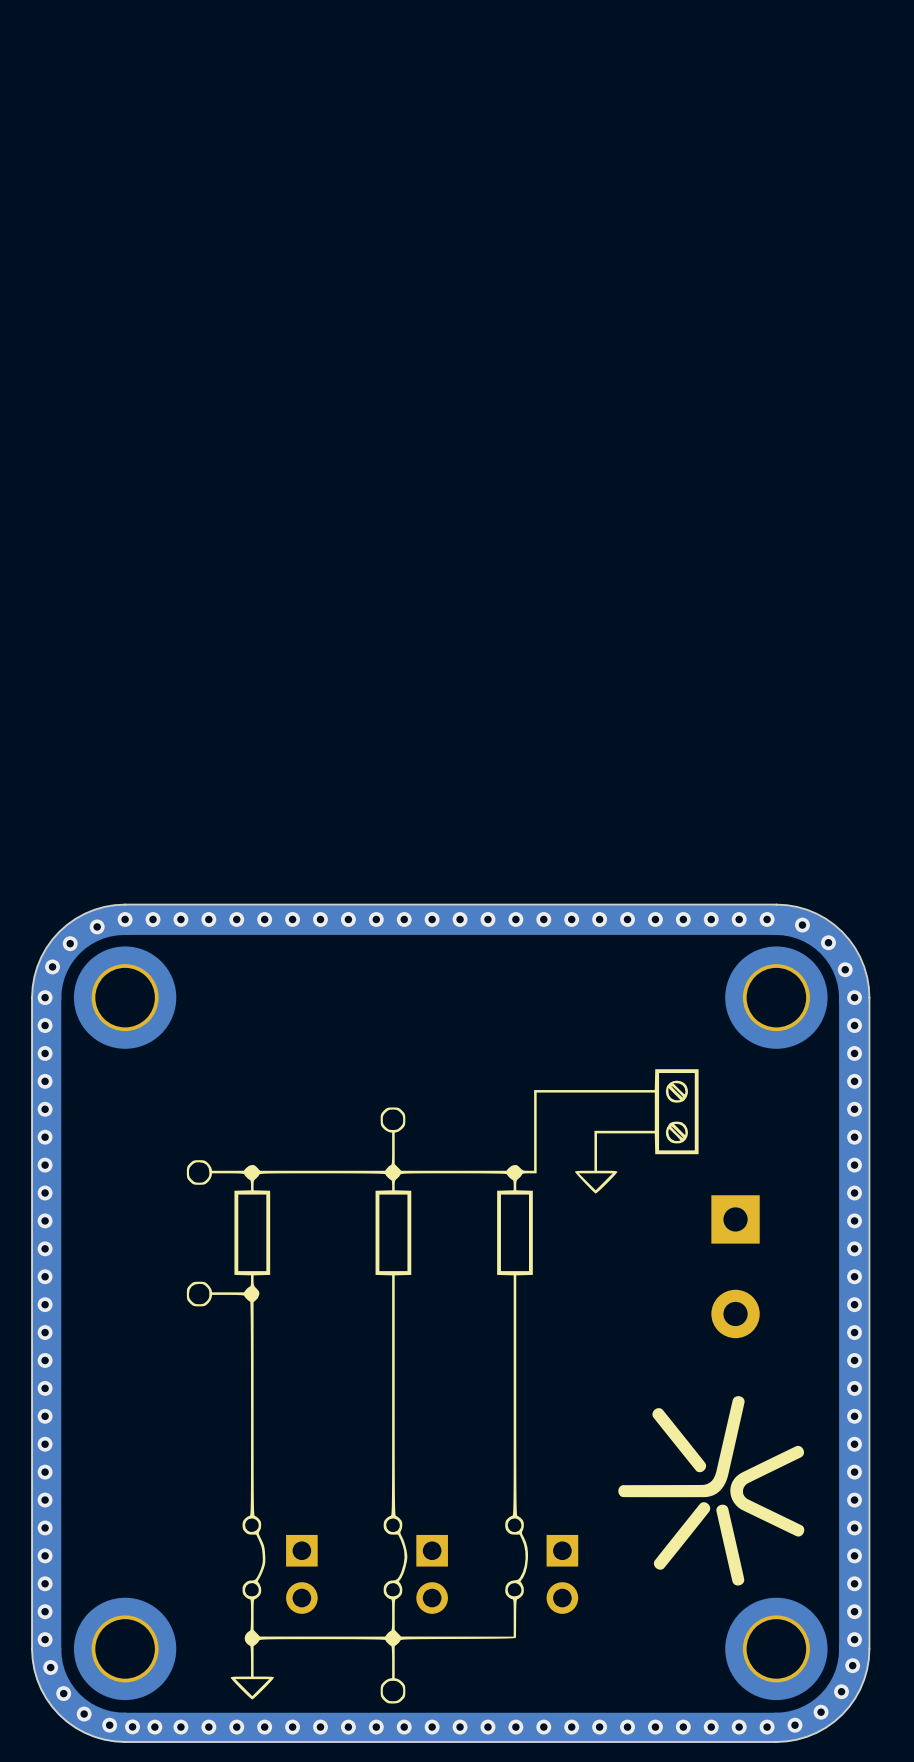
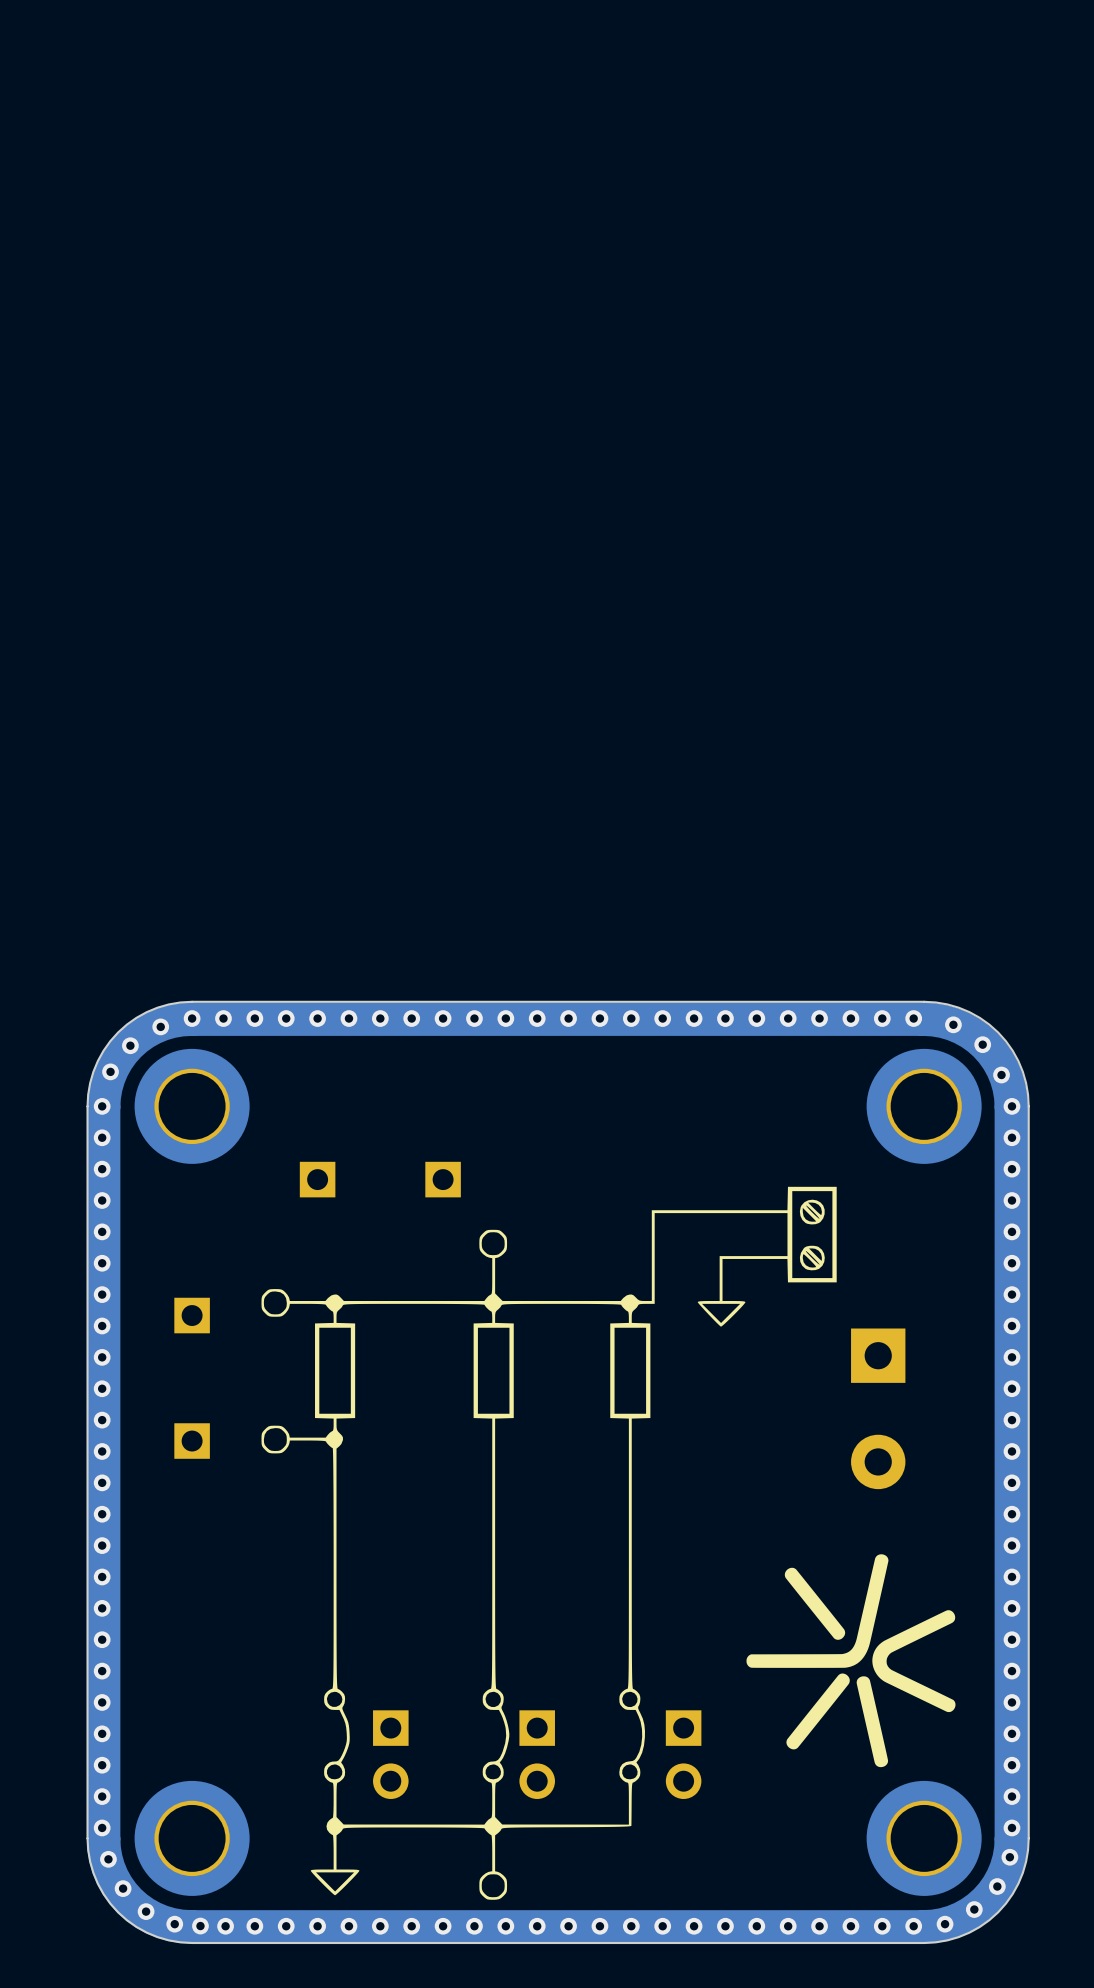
part: none -> (317, 1179)
part: none -> (443, 1179)
part: none -> (192, 1315)
part: none -> (192, 1441)

